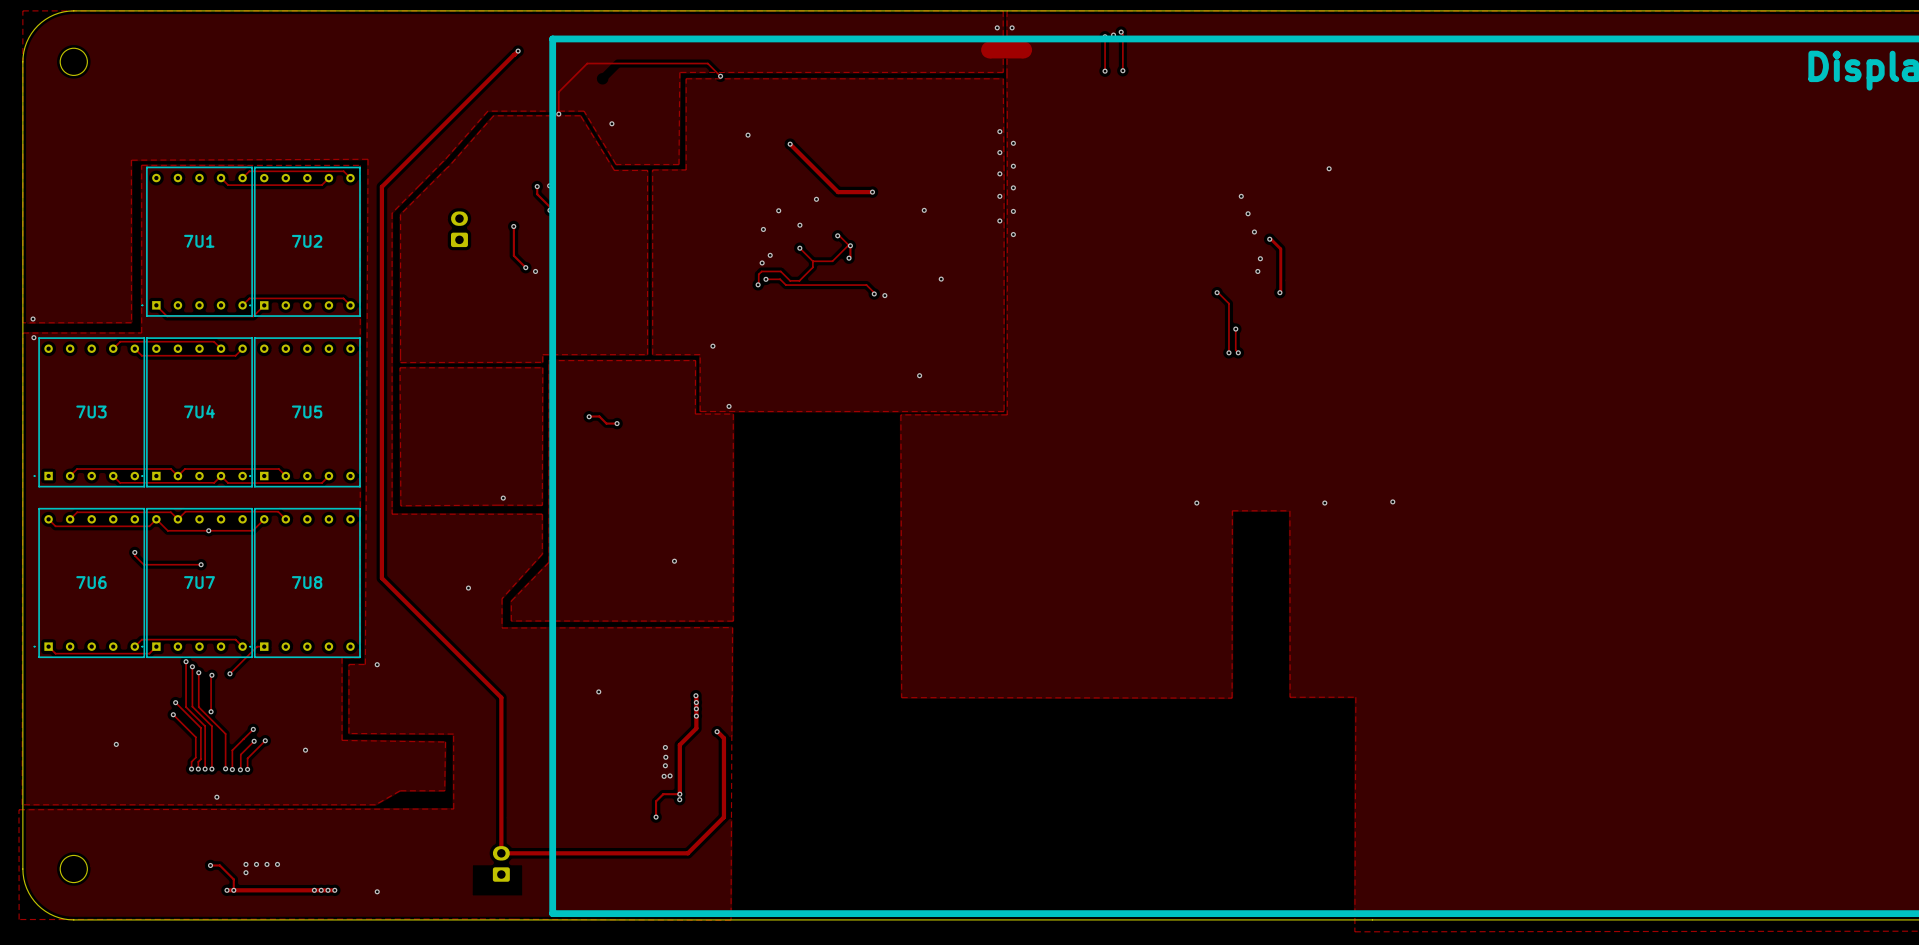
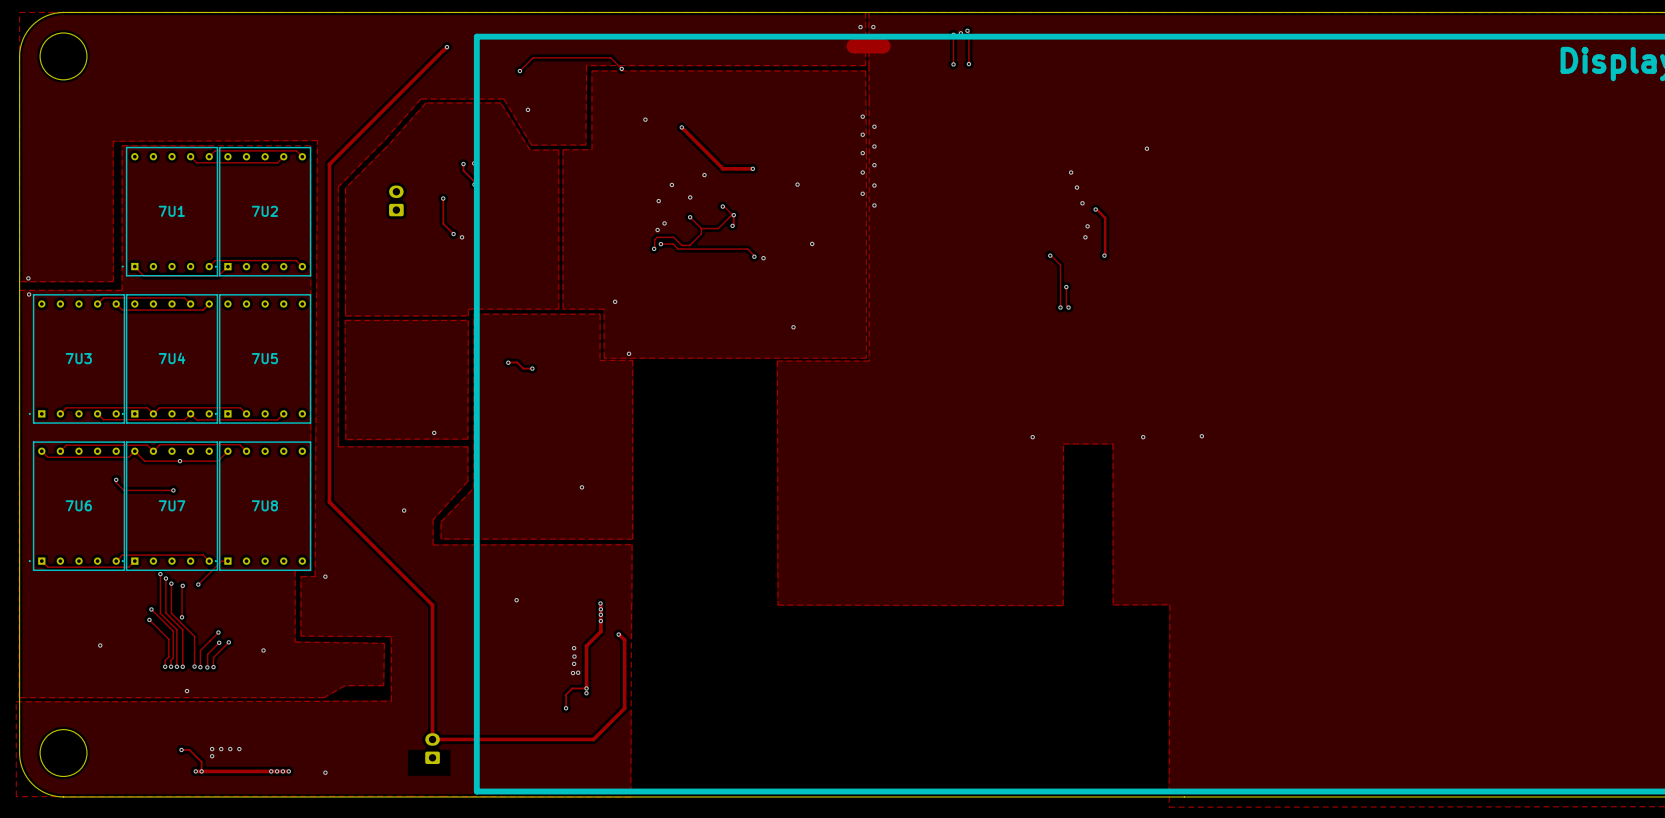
round board edge size: [60, 48, 88, 76] -> [39, 32, 88, 81]
track: (617, 63) (587, 63) (558, 92) (558, 114) -> (533, 57) (519, 71)
via: none -> (519, 71)
via: (558, 114) -> none
round board edge size: [60, 855, 88, 883] -> [39, 729, 88, 777]

